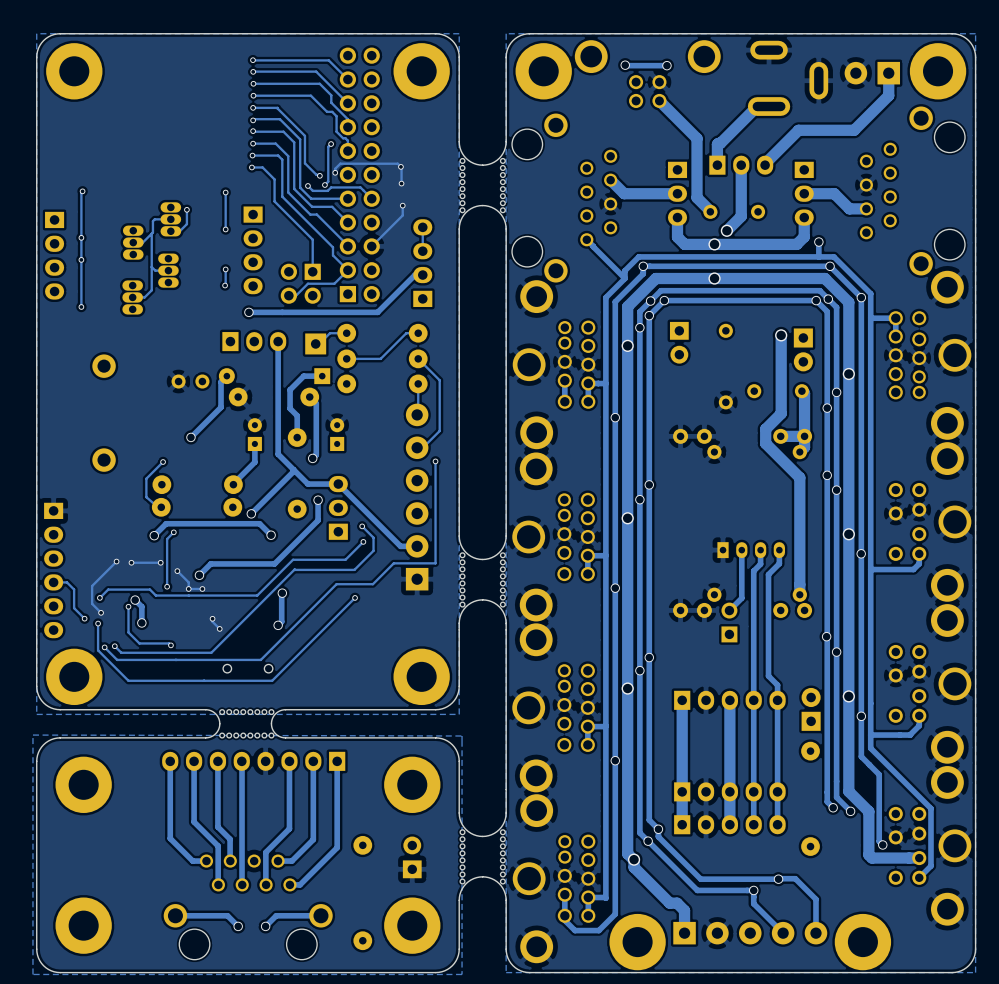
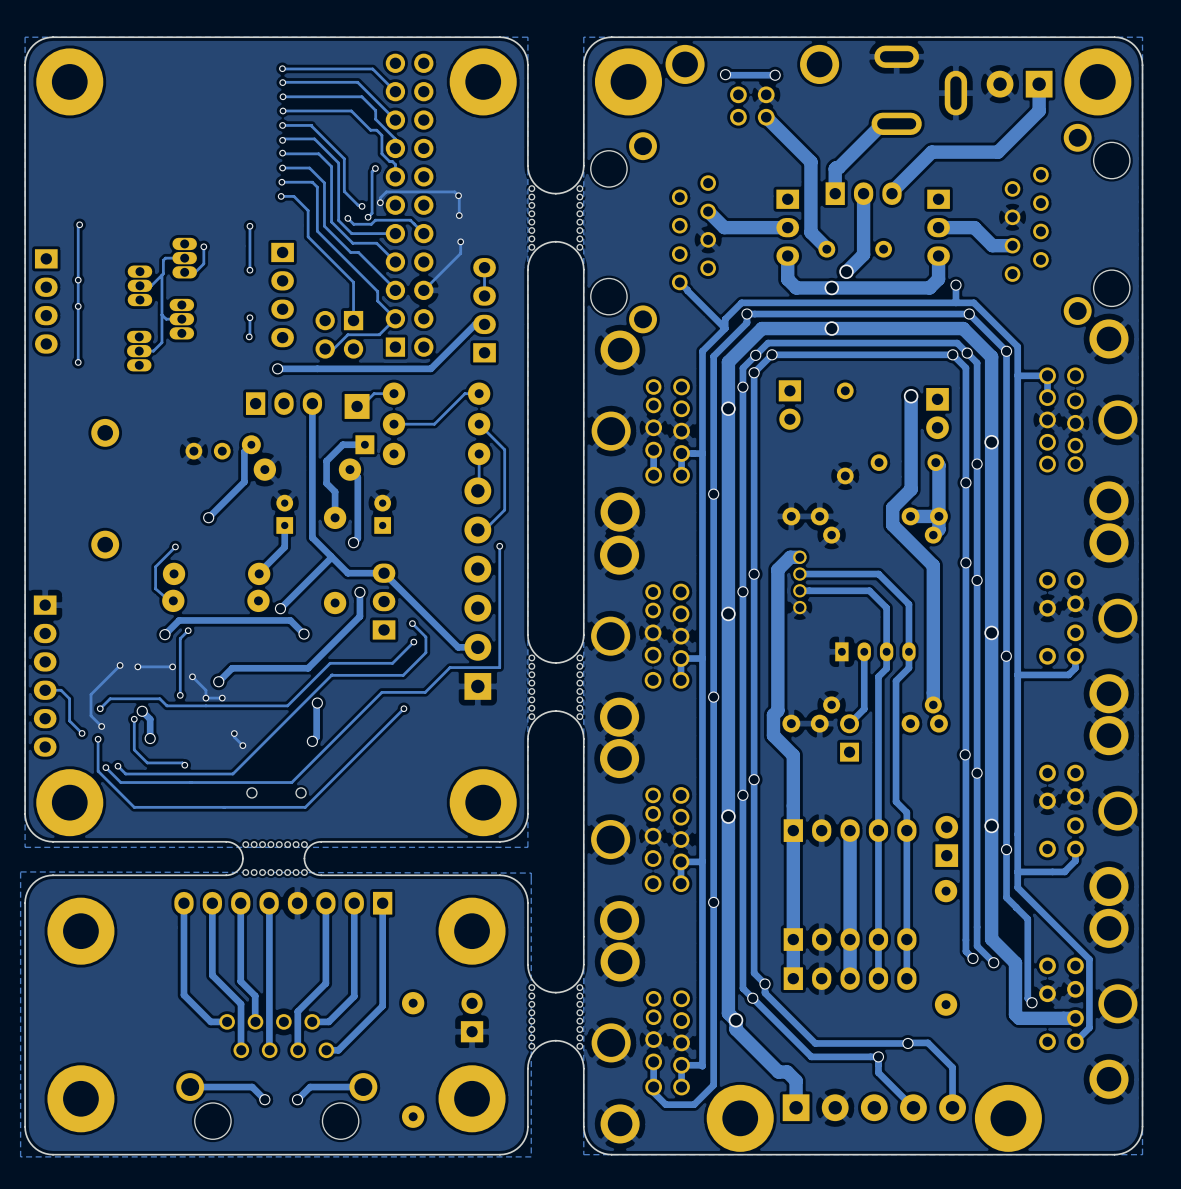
track: none -> (799, 557) (790, 557) (777, 569) (777, 710) (773, 715) (773, 735) (793, 755) (793, 830)
track: none -> (799, 574) (878, 574) (908, 604) (908, 651)
part: none -> (799, 582)
track: none -> (799, 590) (869, 590) (886, 607) (886, 651)

